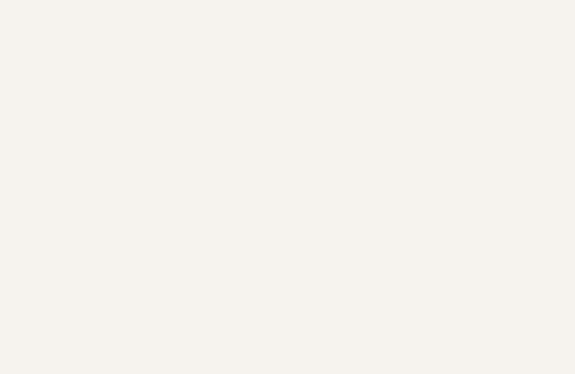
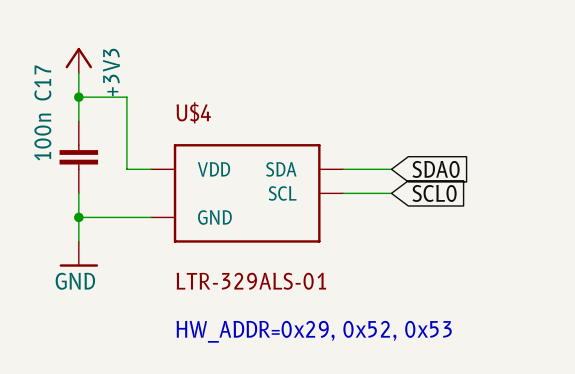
power symbol: none -> +3V3 (78, 60)
wire: none -> (78, 73) (78, 121)
wire: none -> (78, 97) (126, 97) (126, 169) (150, 169)
junction: none -> (78, 97)
C17: none -> 100n (78, 157)
wire: none -> (343, 169) (391, 169)
global label: none -> SDA0 (436, 169)
wire: none -> (78, 193) (78, 241)
U$4: none -> LTR-329ALS-01 (247, 193)
wire: none -> (343, 193) (391, 193)
global label: none -> SCL0 (434, 193)
wire: none -> (78, 217) (150, 217)
junction: none -> (78, 217)
power symbol: none -> GND (78, 254)
text: none -> HW_ADDR=0x29, 0x52, 0x53 (314, 331)

